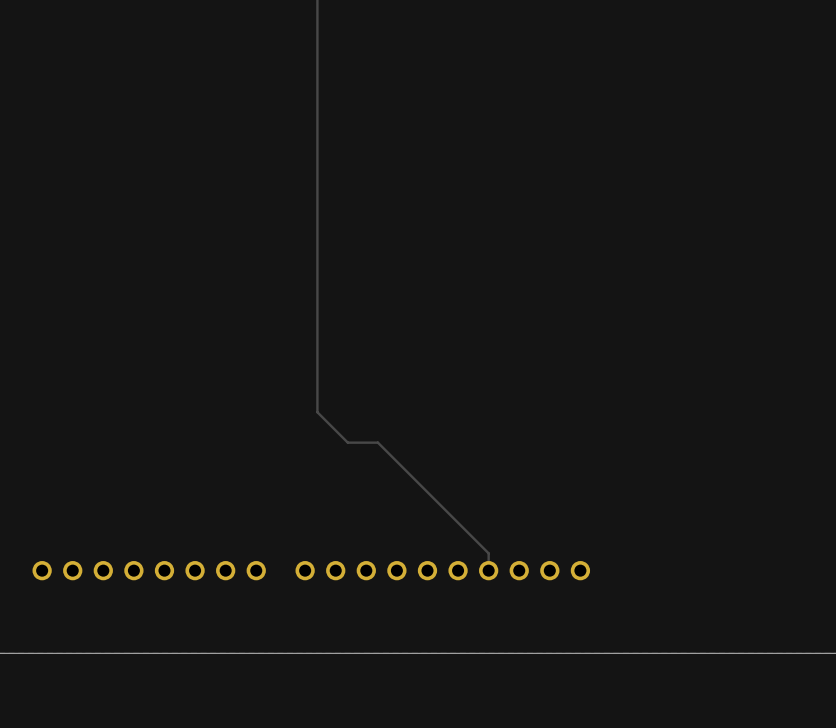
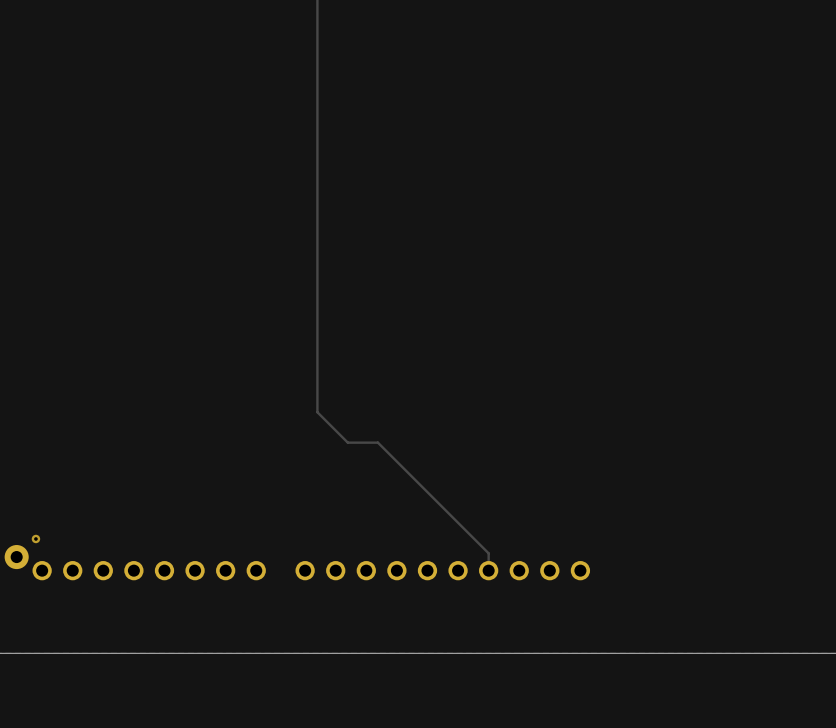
via: none -> (35, 538)
part: none -> (16, 557)

